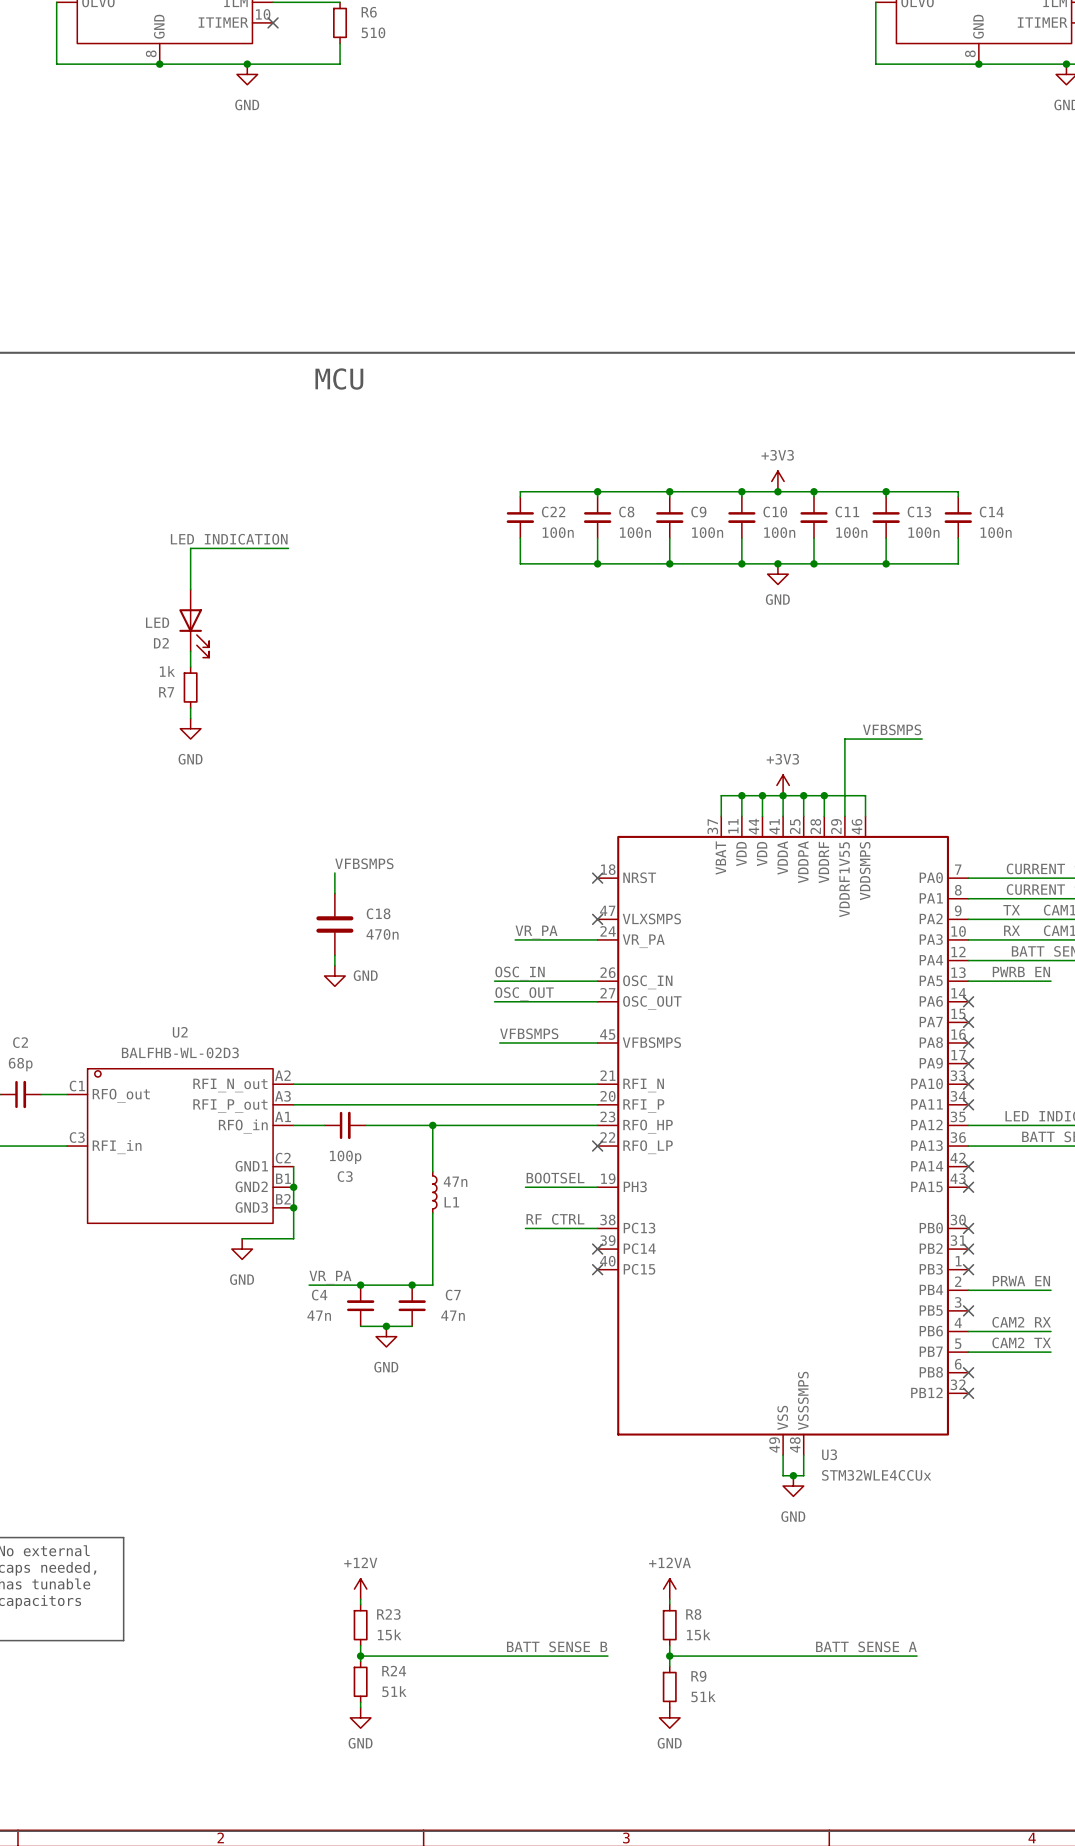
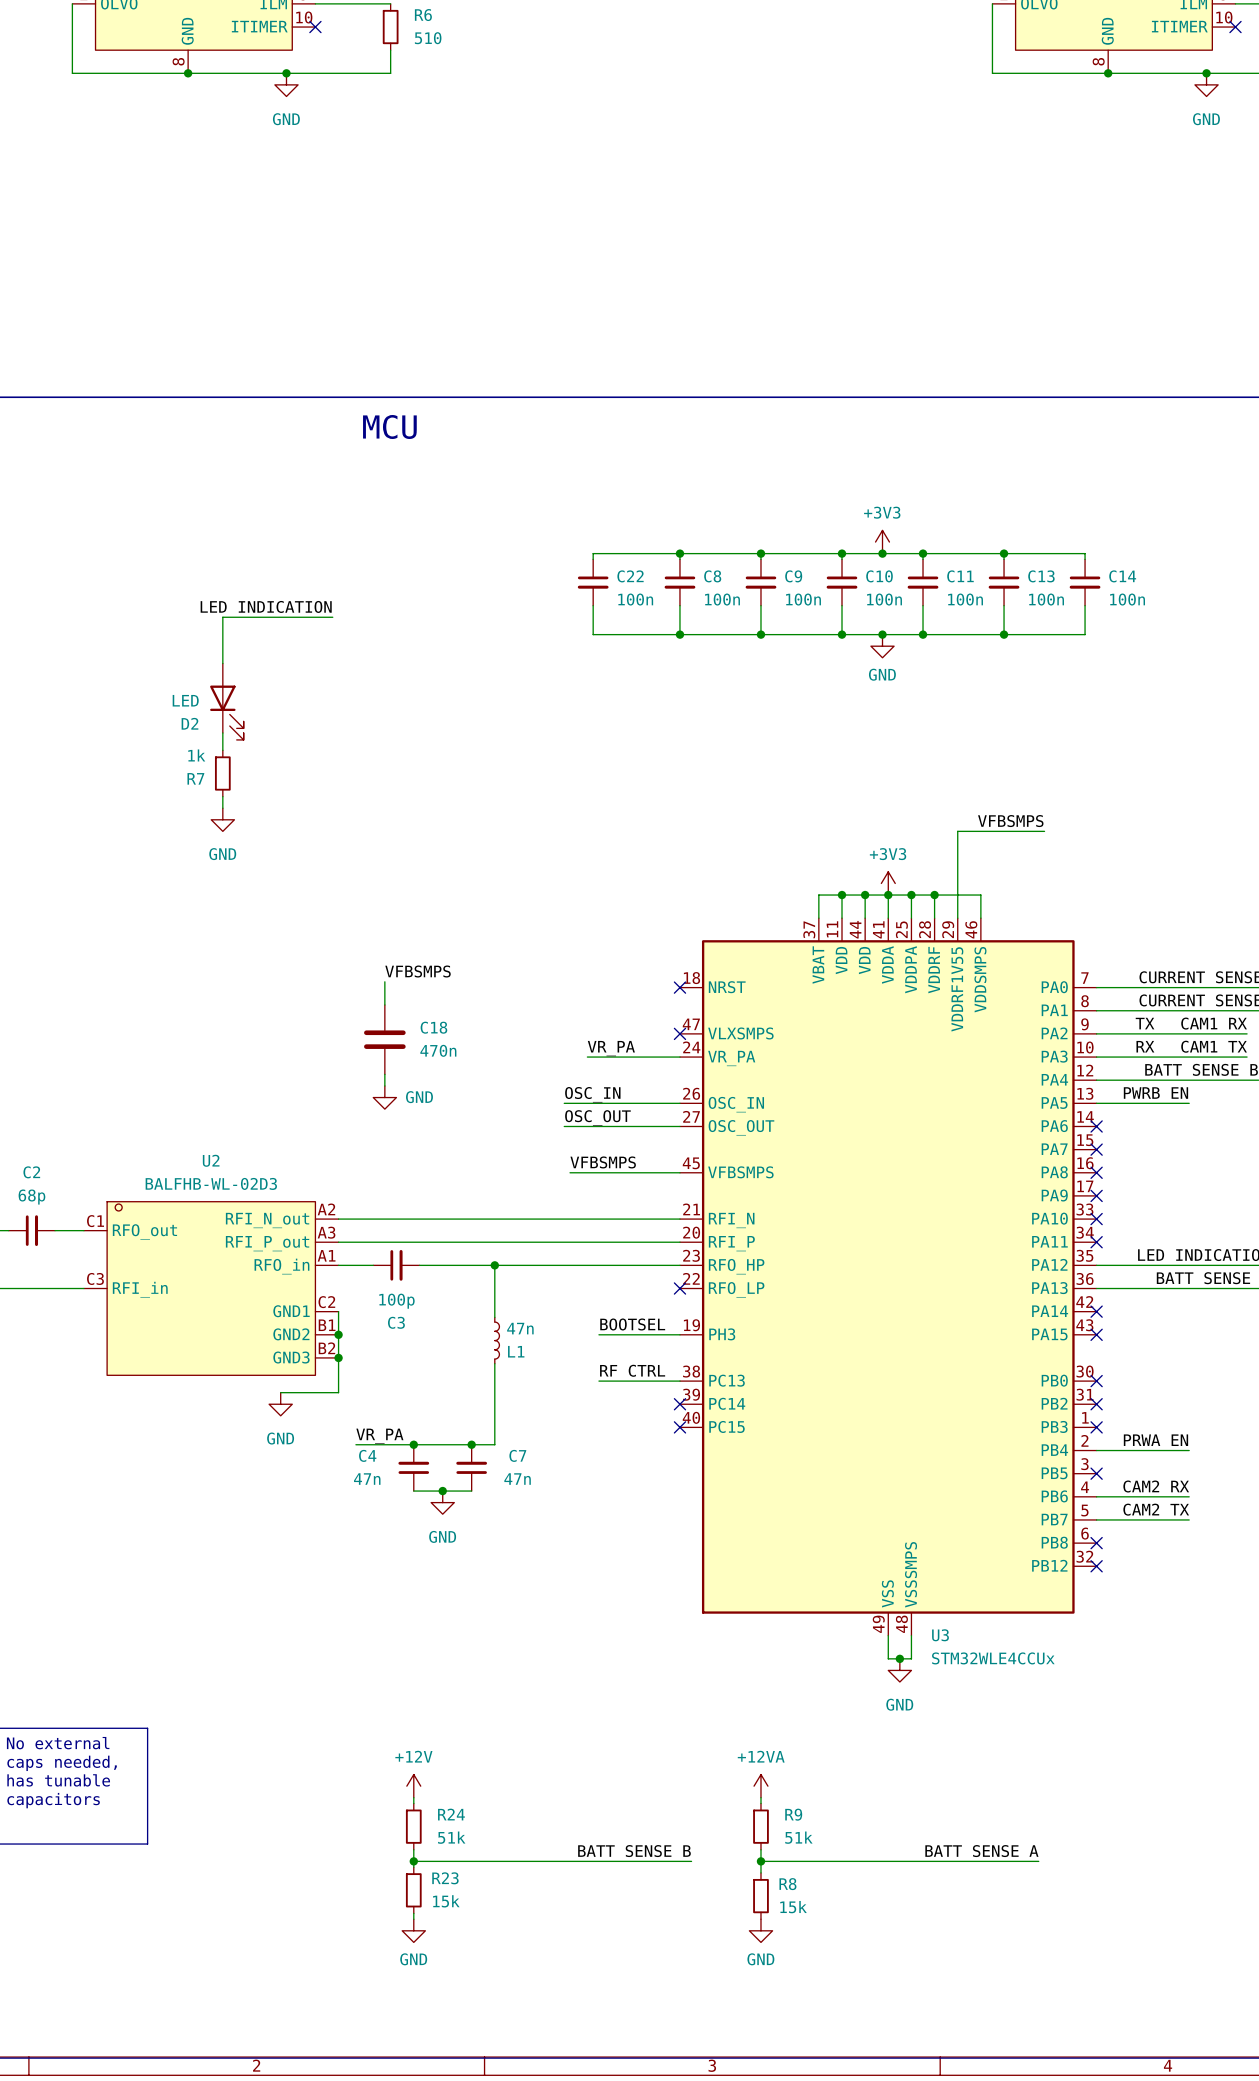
R23 name: R23 (388, 1614) -> R24 (451, 1814)
R8 name: R8 (693, 1614) -> R9 (793, 1814)
R23 value: 15k (389, 1634) -> 51k (451, 1837)
R8 value: 15k (698, 1634) -> 51k (798, 1837)
R24 name: R24 (394, 1671) -> R23 (445, 1878)
R9 name: R9 (698, 1676) -> R8 (787, 1884)
R24 value: 51k (394, 1691) -> 15k (446, 1901)
R9 value: 51k (703, 1696) -> 15k (793, 1907)

